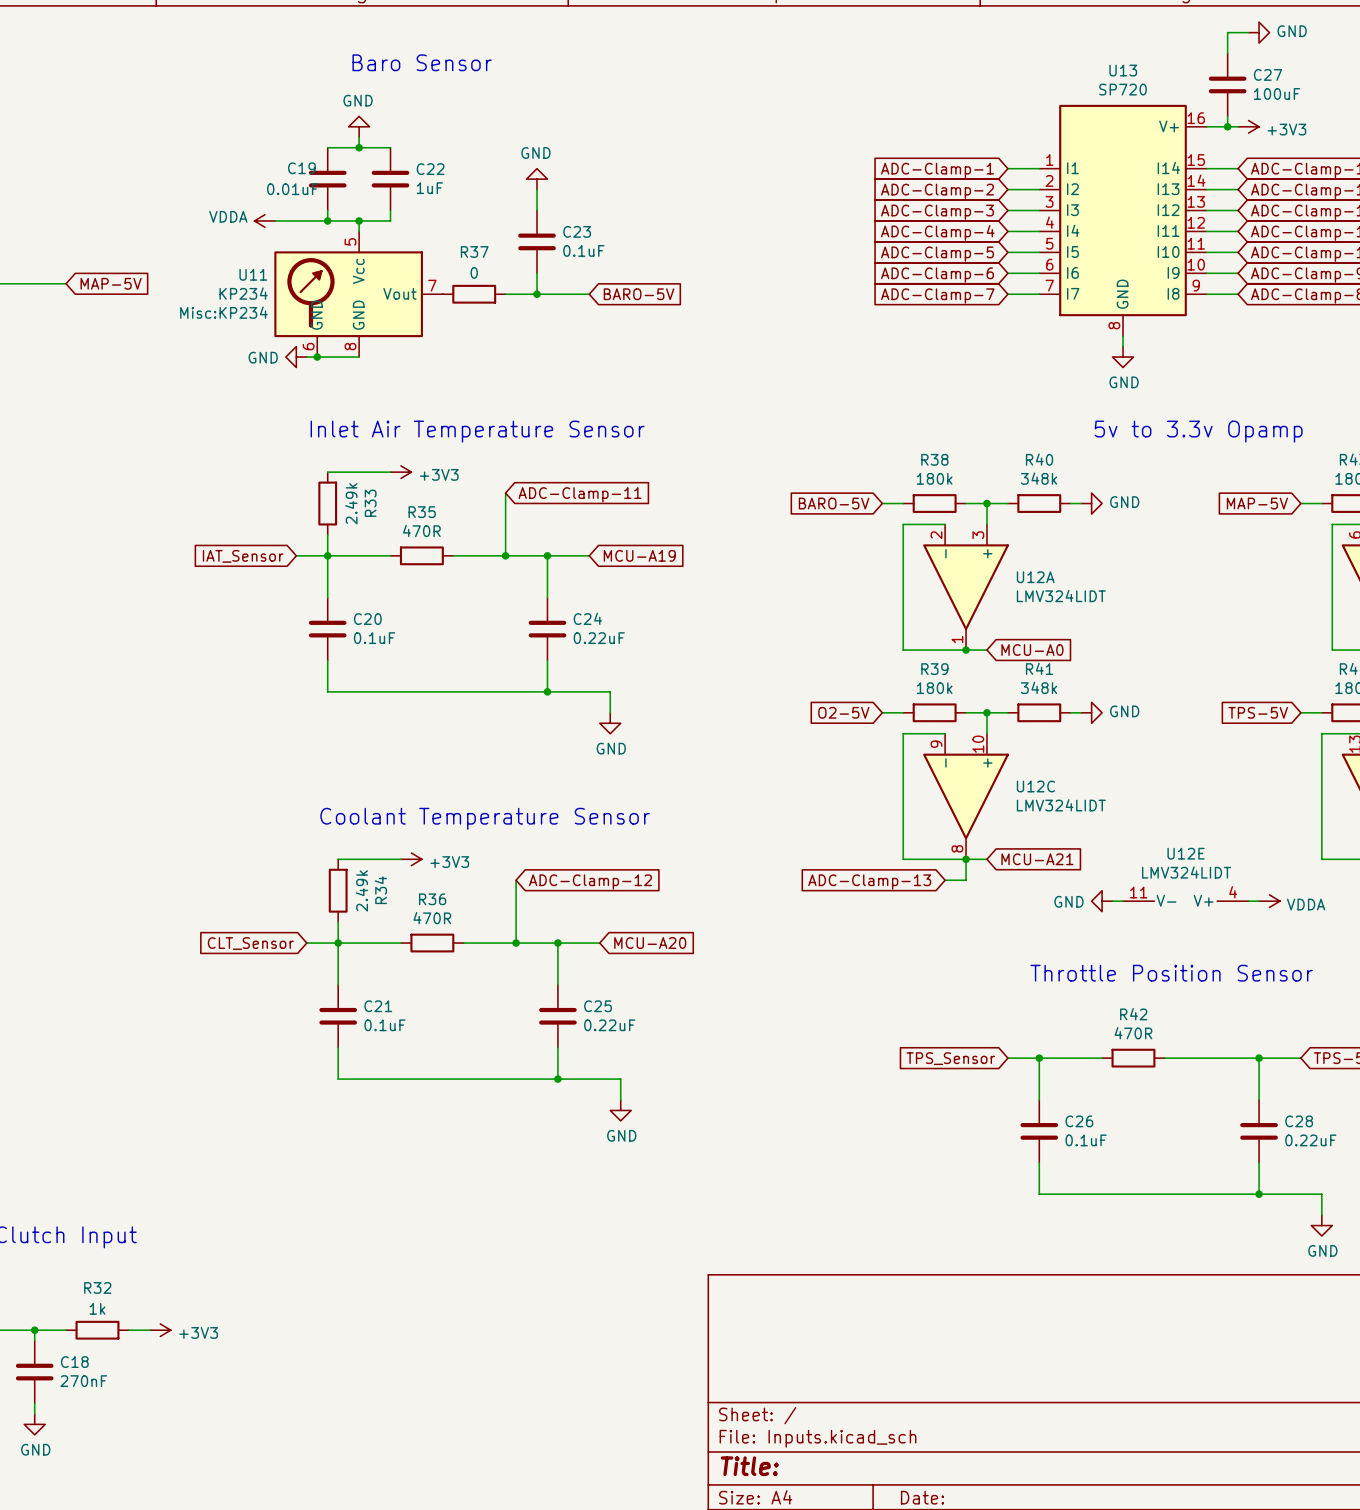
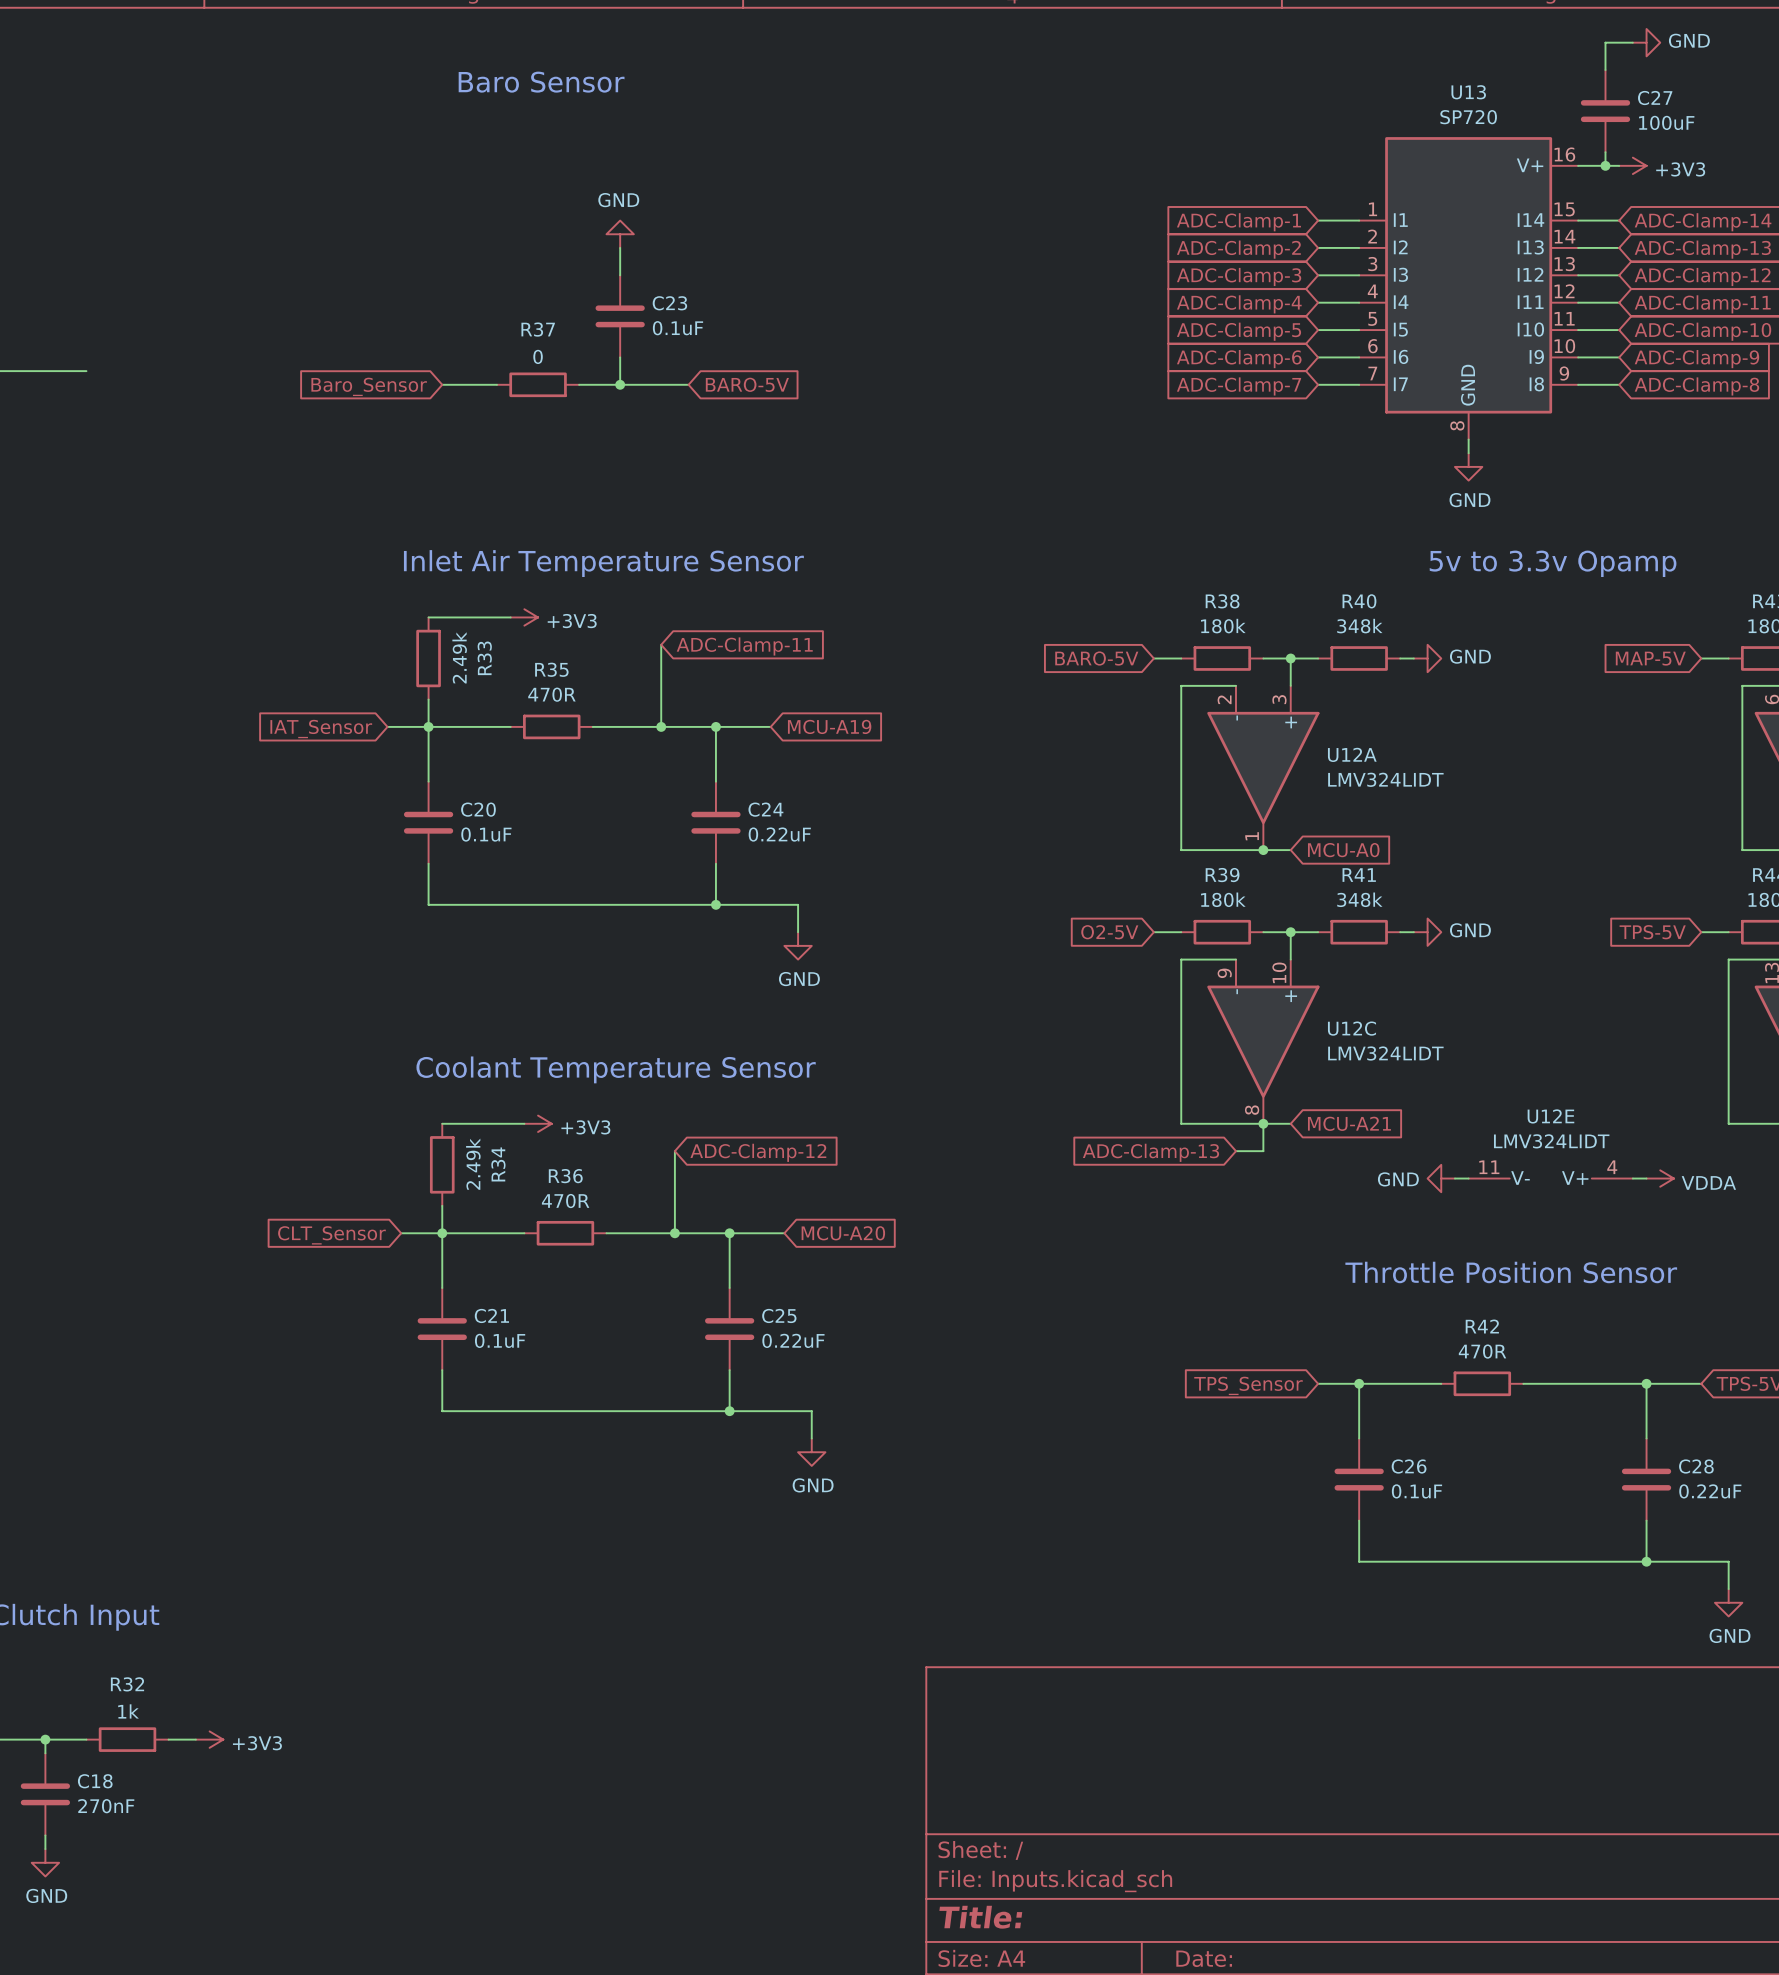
power symbol: GND (359, 126) -> none
wire: (359, 137) (359, 147) -> none
wire: (327, 147) (390, 147) -> none
junction: (359, 147) -> none
C19: 0.01uF (327, 179) -> none
C22: 1uF (390, 179) -> none
power symbol position: GND (537, 179) -> GND (620, 234)
wire: (537, 189) (537, 210) -> (620, 247) (620, 275)
wire: (327, 210) (327, 220) -> none
wire: (390, 210) (390, 220) (275, 220) -> none
power symbol: VDDA (264, 220) -> none
junction: (327, 220) -> none
wire: (359, 220) (359, 231) -> none
junction: (359, 220) -> none
C23 position: (537, 241) -> (620, 316)
wire: (537, 273) (537, 294) -> (620, 357) (620, 384)
global label: MAP-5V (111, 283) -> none
global label: none -> Baro_Sensor (369, 386)
U11: KP234 (358, 294) -> none
junction: none -> (620, 384)
R37 position: (474, 294) -> (538, 384)
wire: (526, 294) (589, 294) -> (579, 384) (661, 384)
junction: (537, 294) -> none
global label position: BARO-5V (639, 294) -> BARO-5V (747, 384)
power symbol: GND (296, 357) -> none
wire: (306, 357) (359, 357) -> none
junction: (317, 357) -> none

